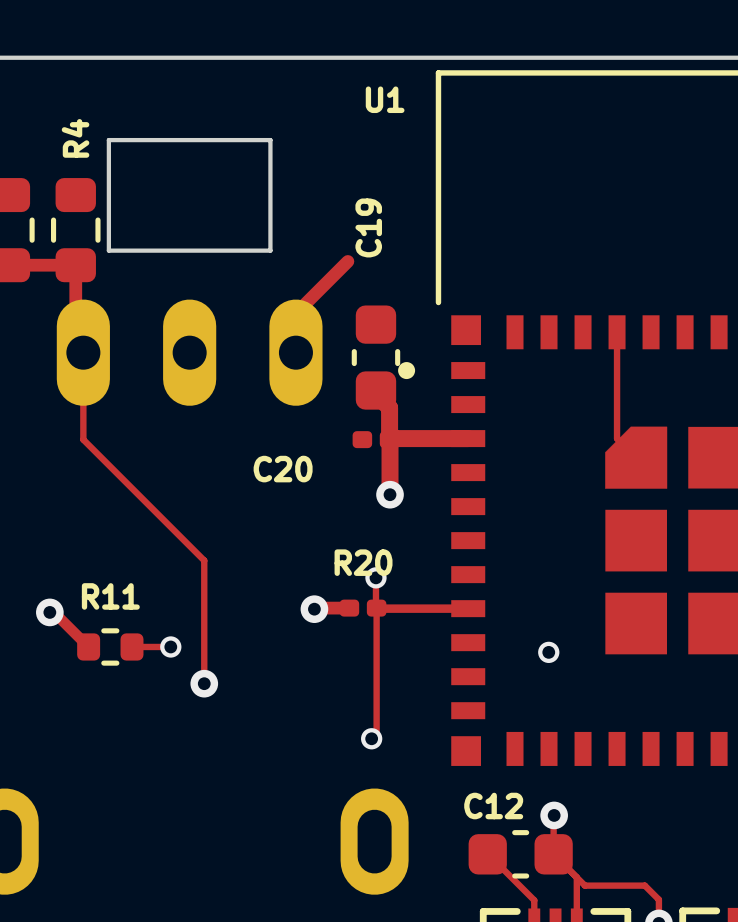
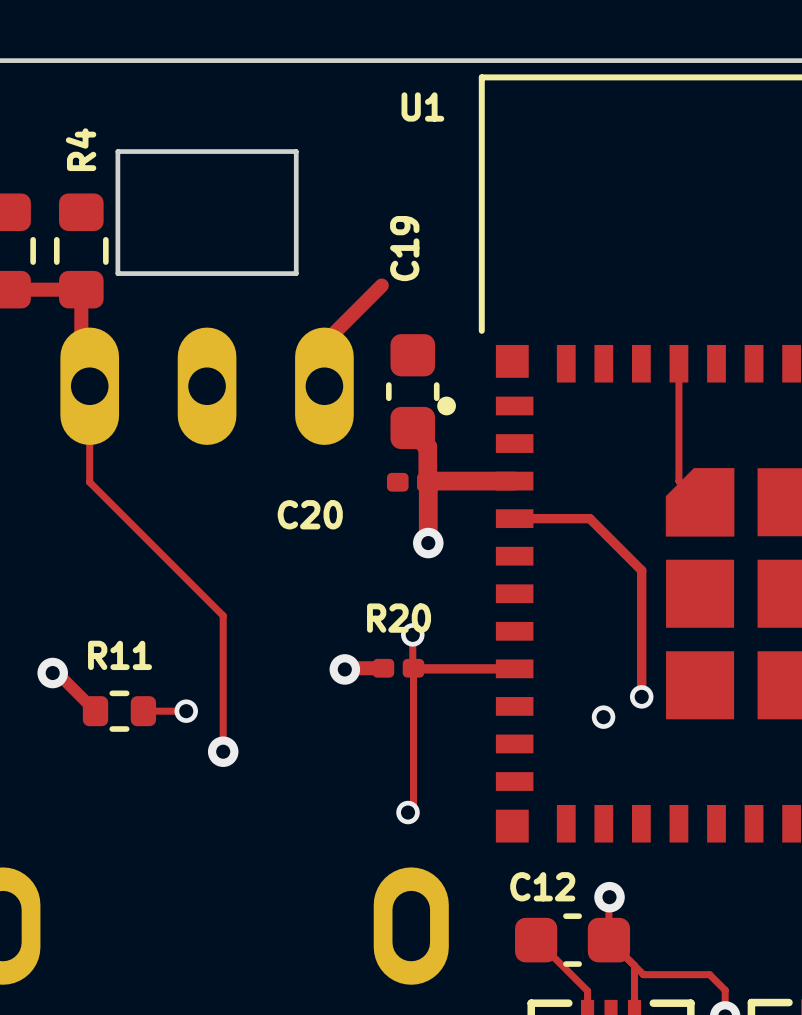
track: none -> (514, 518) (589, 518) (641, 570) (641, 696)
via: none -> (641, 696)

